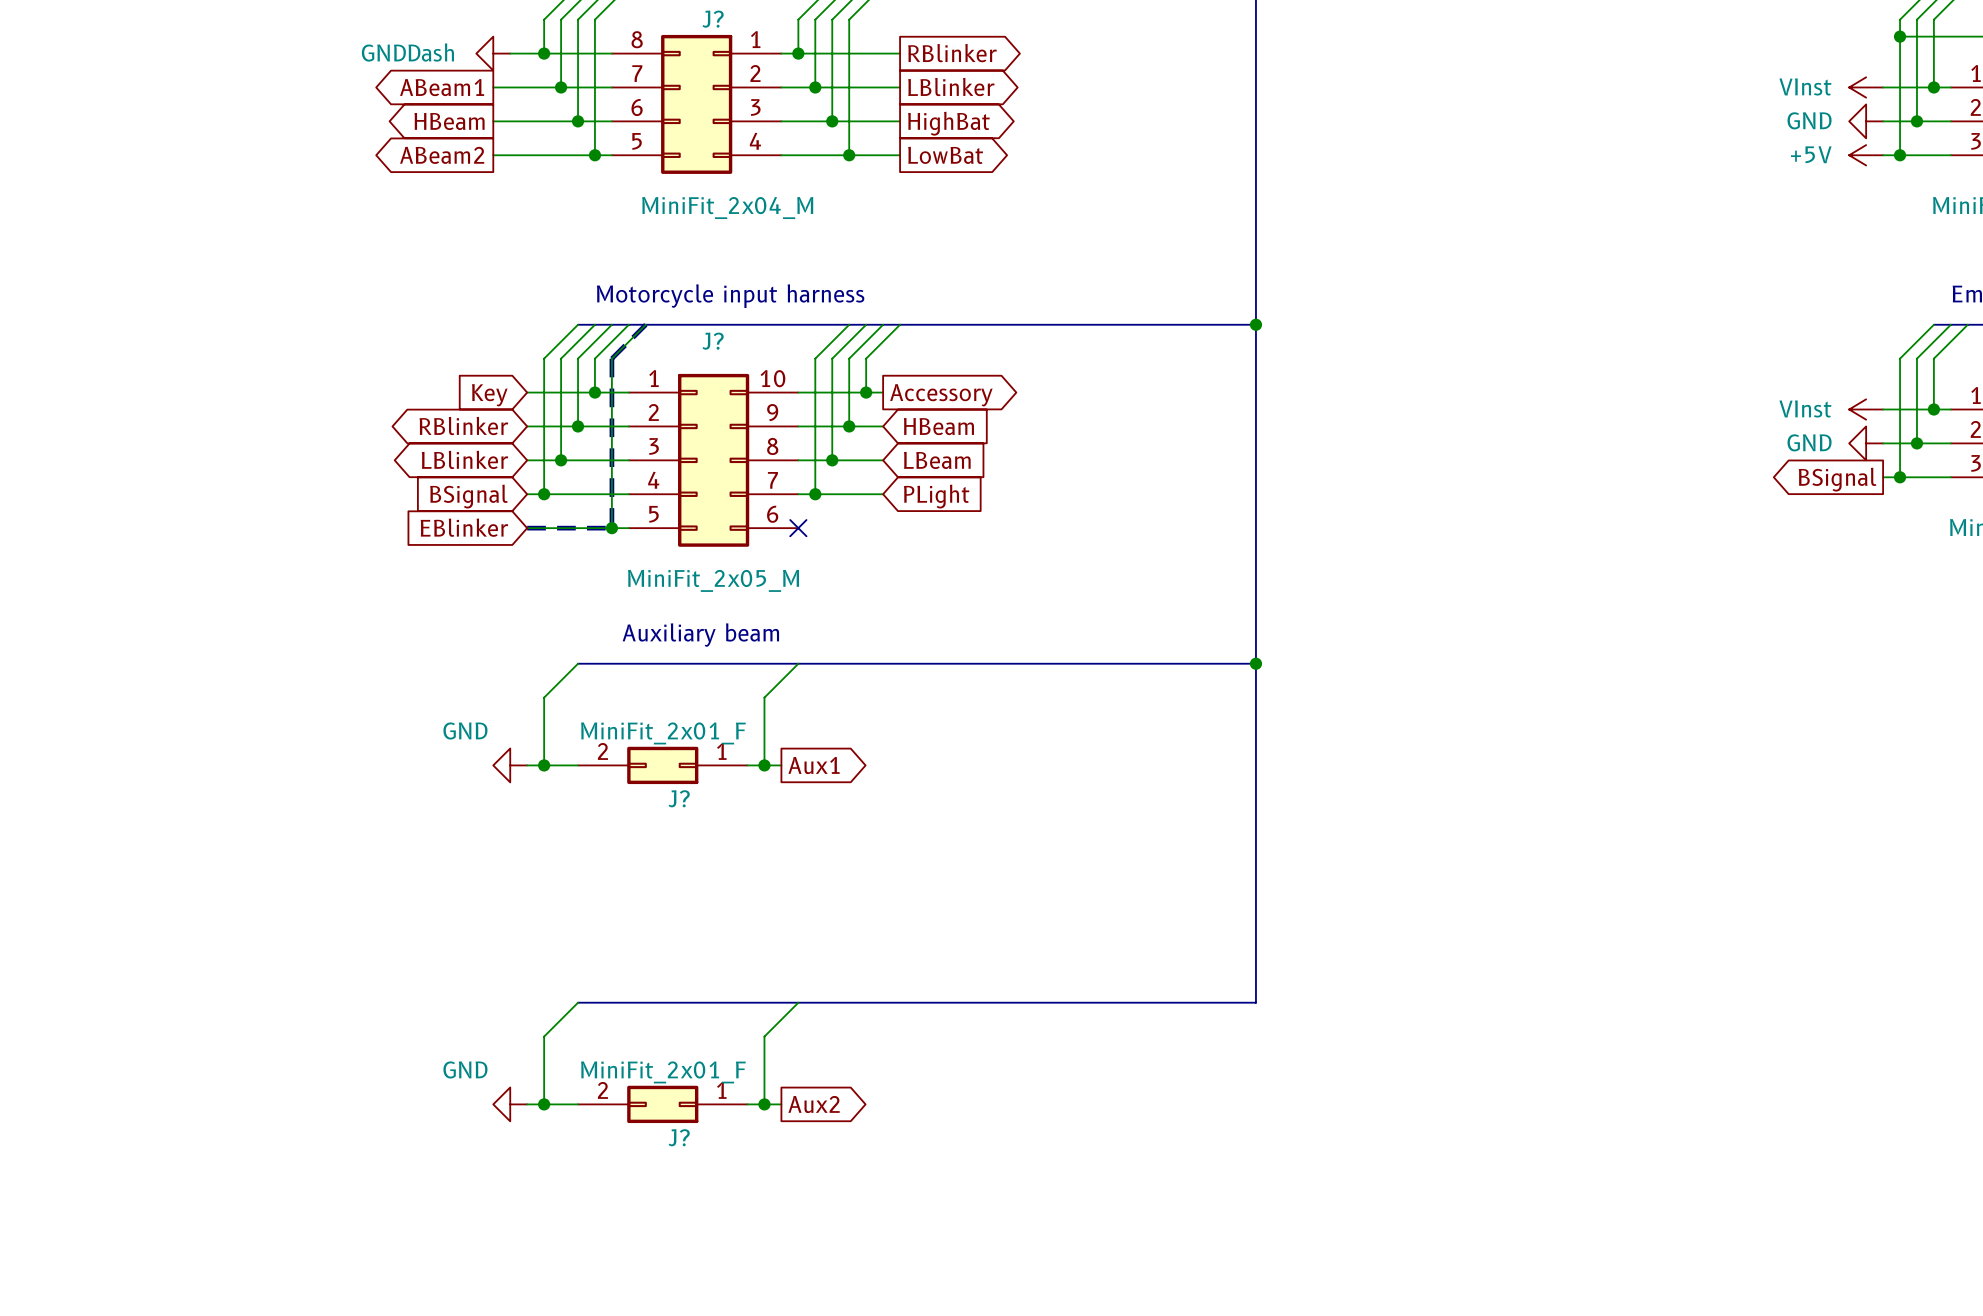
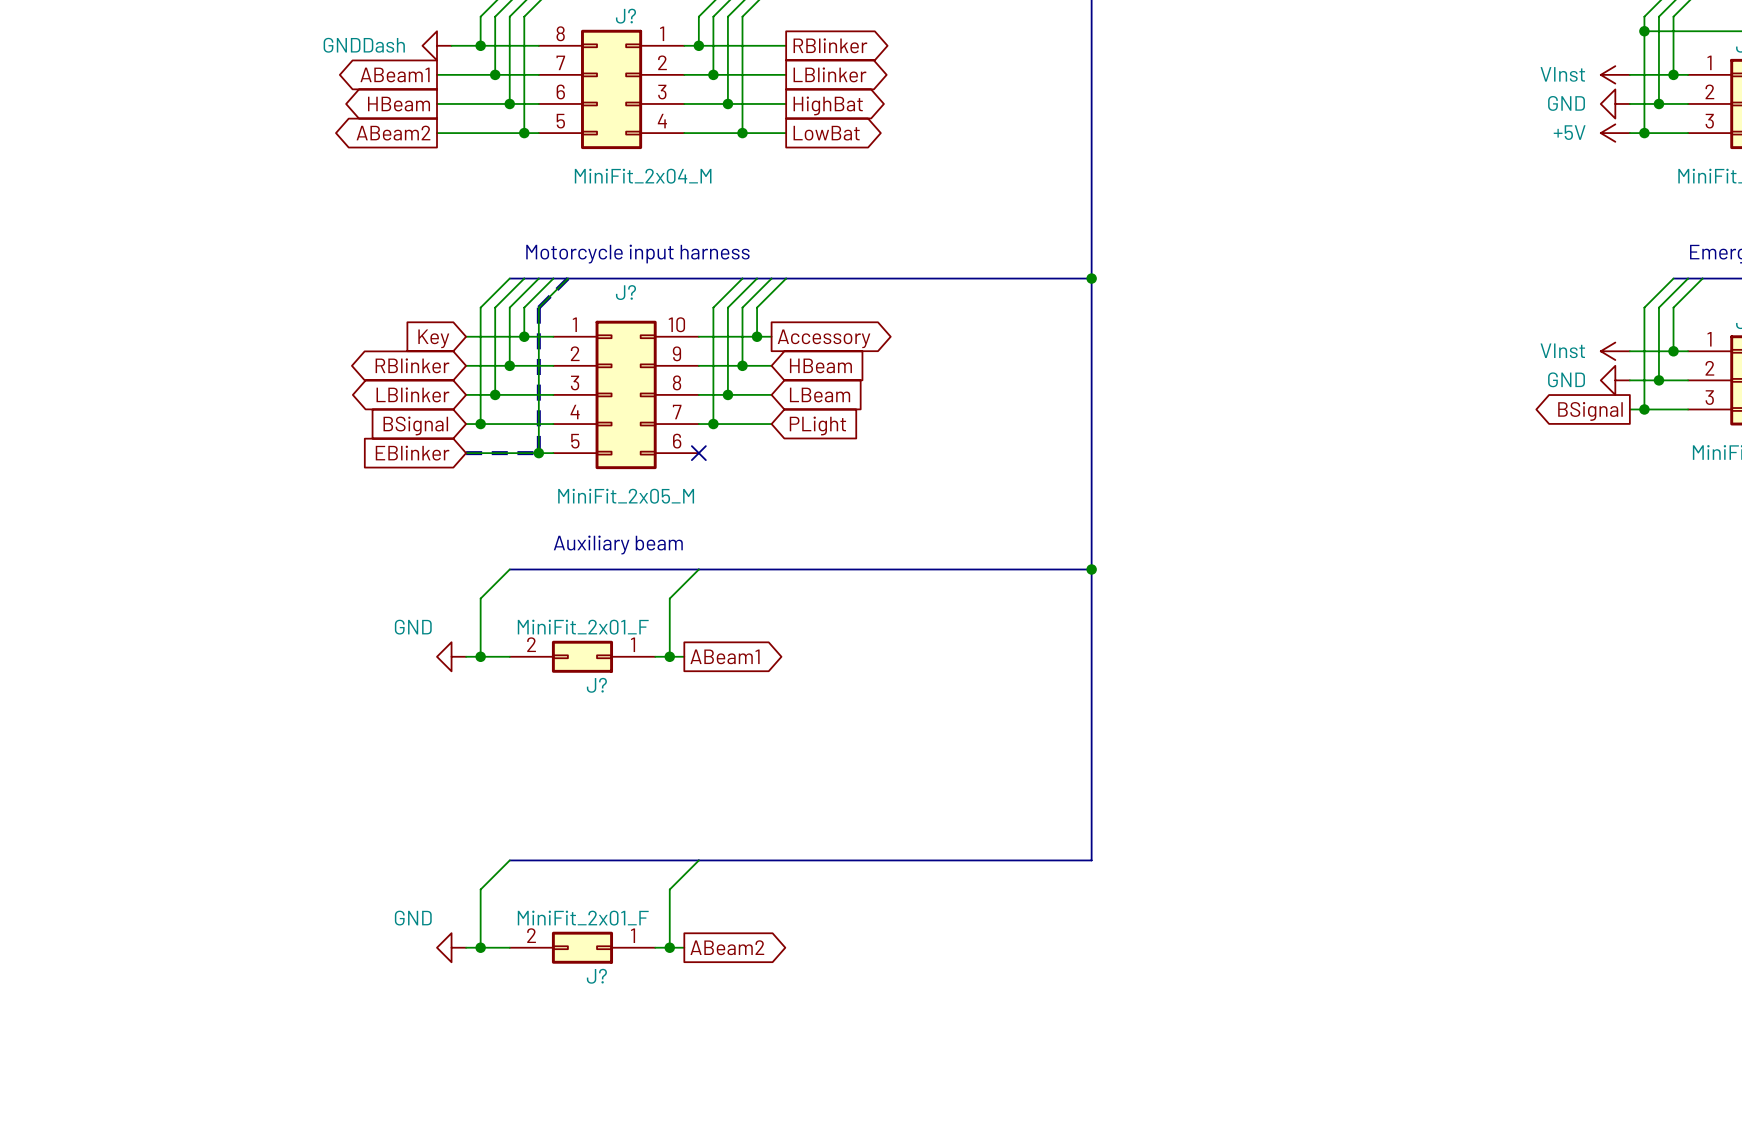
global label: Aux1 (814, 765) -> ABeam1 (725, 656)
global label: Aux2 (814, 1104) -> ABeam2 (727, 947)

